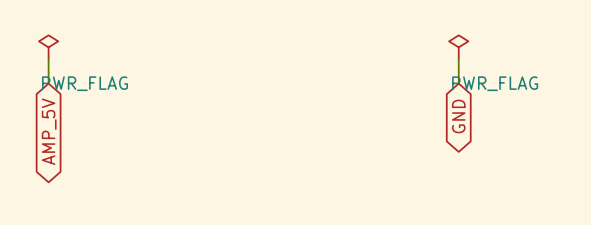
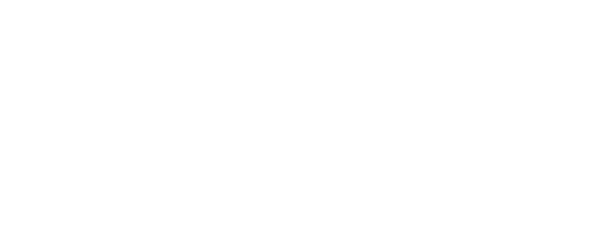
power symbol: PWR_FLAG (48, 47) -> none
power symbol: PWR_FLAG (458, 47) -> none
wire: (48, 59) (48, 83) -> none
wire: (458, 59) (458, 83) -> none
global label: GND (458, 116) -> none
global label: AMP_5V (49, 131) -> none

